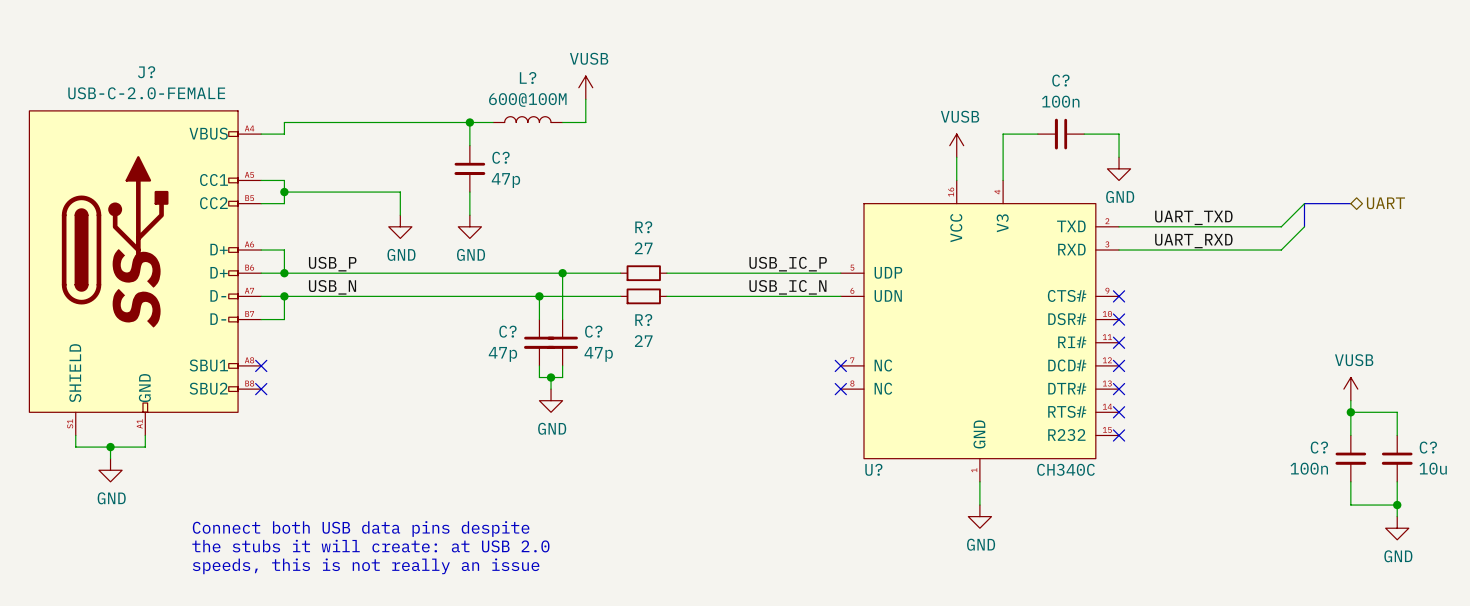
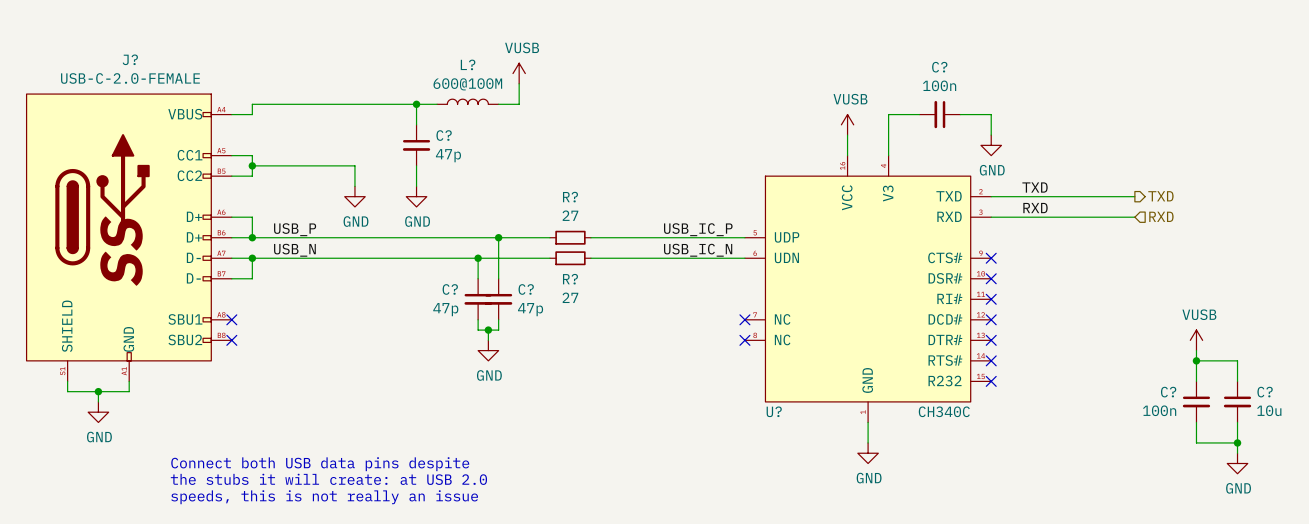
wire: (1304, 203) (1281, 226) -> none
bus: (1350, 203) (1304, 203) (1304, 226) -> none
hierarchical label: UART (1385, 203) -> none
label: UART_TXD (1193, 217) -> TXD (1035, 187)
wire: (1304, 226) (1281, 250) -> none
hierarchical label: none -> TXD (1160, 196)
label: UART_RXD (1193, 241) -> RXD (1035, 208)
hierarchical label: none -> RXD (1161, 216)

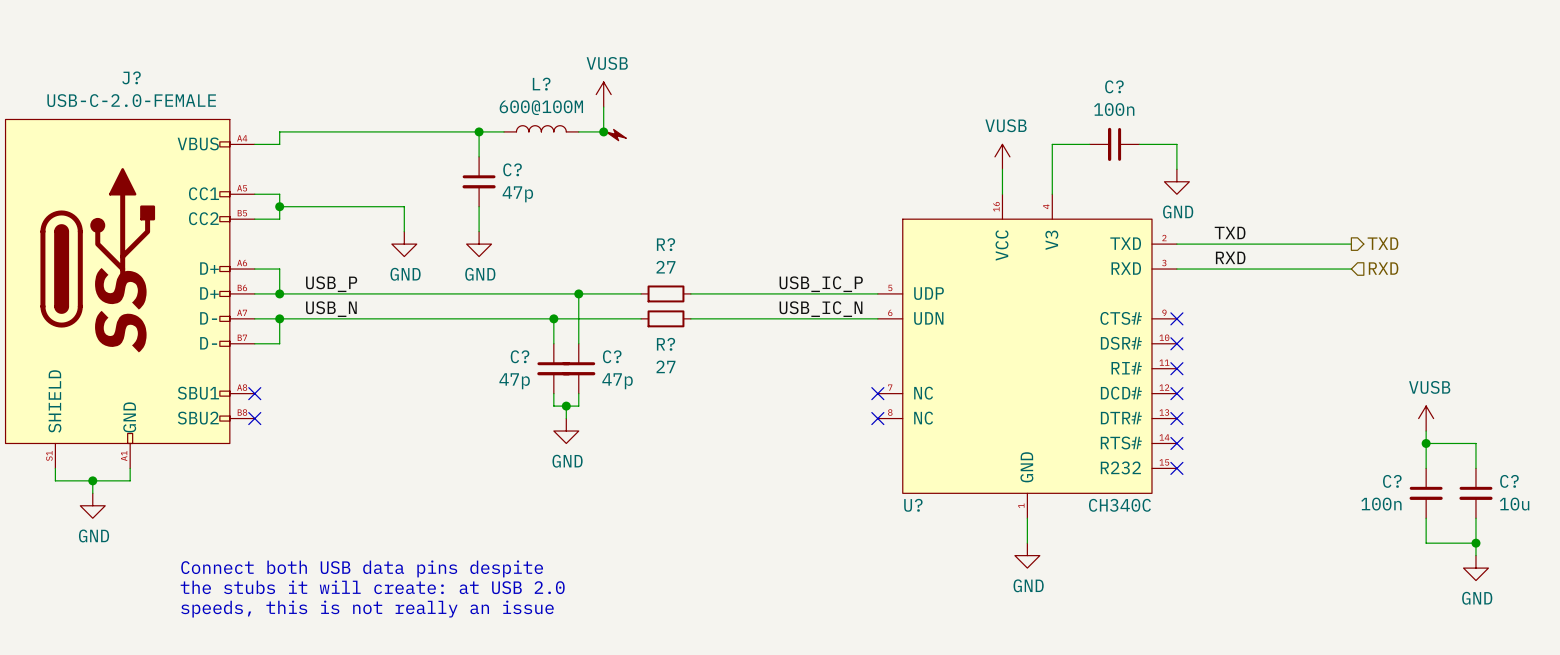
junction: none -> (603, 131)
power symbol: none -> (616, 135)

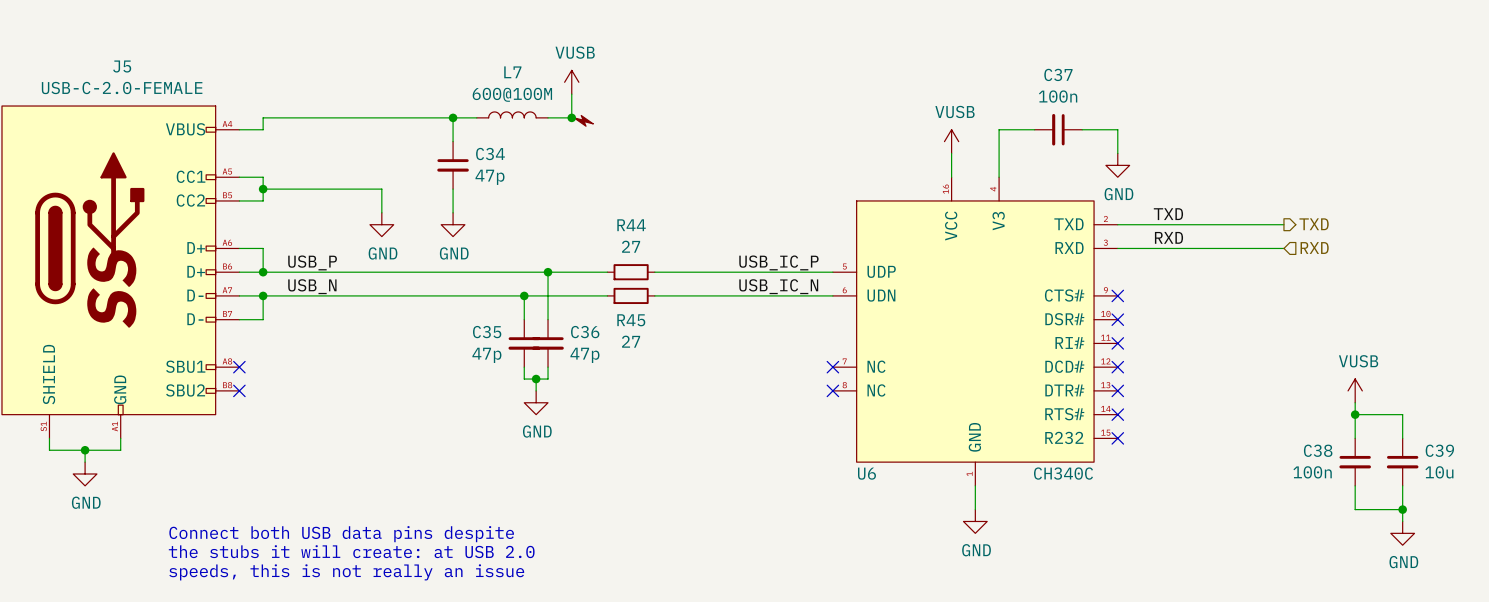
J? name: J? (131, 77) -> J5 (122, 66)
L? name: L? (541, 84) -> L7 (512, 72)
C? name: C? (1114, 86) -> C37 (1058, 74)
C? name: C? (512, 169) -> C34 (490, 154)
R? name: R? (665, 244) -> R44 (631, 225)
R? name: R? (665, 344) -> R45 (631, 320)
C? name: C? (520, 356) -> C35 (487, 332)
C? name: C? (612, 356) -> C36 (585, 332)
C? name: C? (1392, 481) -> C38 (1318, 450)
C? name: C? (1509, 481) -> C39 (1439, 450)
U? name: U? (913, 505) -> U6 (866, 473)

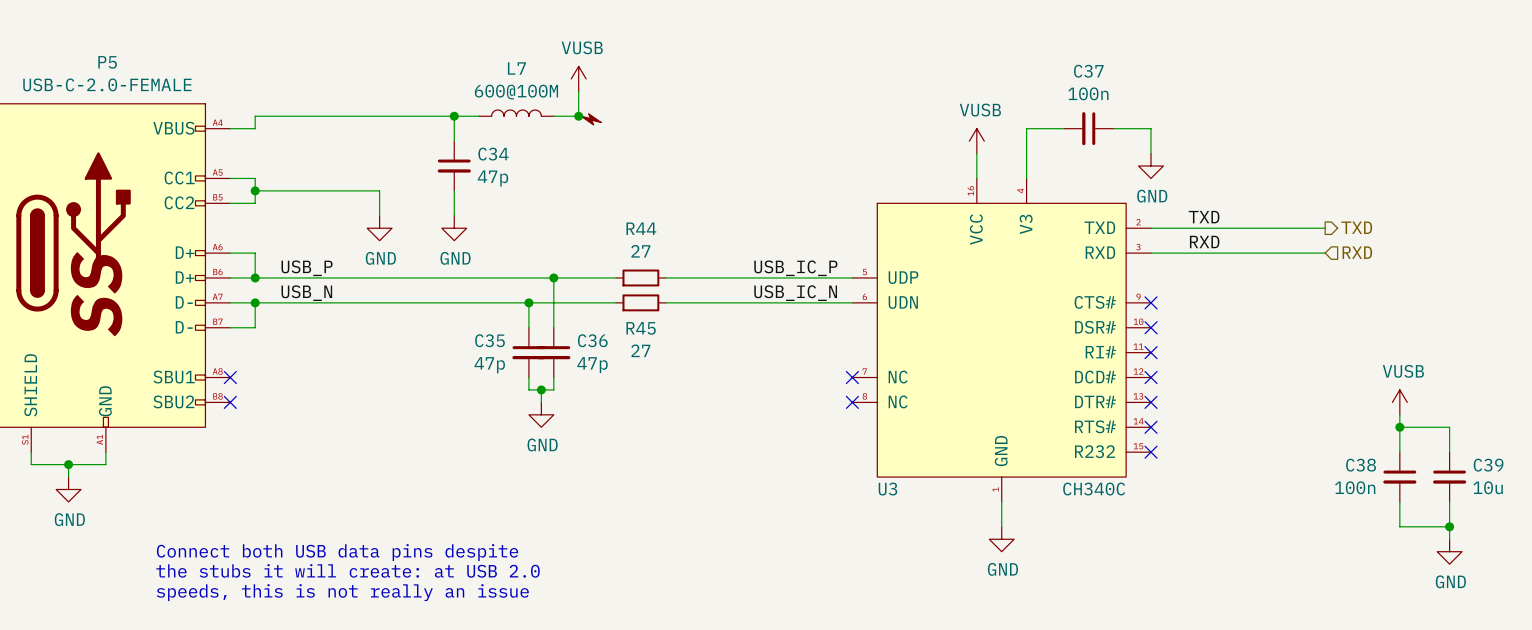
J5 name: J5 (122, 66) -> P5 (107, 62)
U6 name: U6 (866, 473) -> U3 (887, 489)

